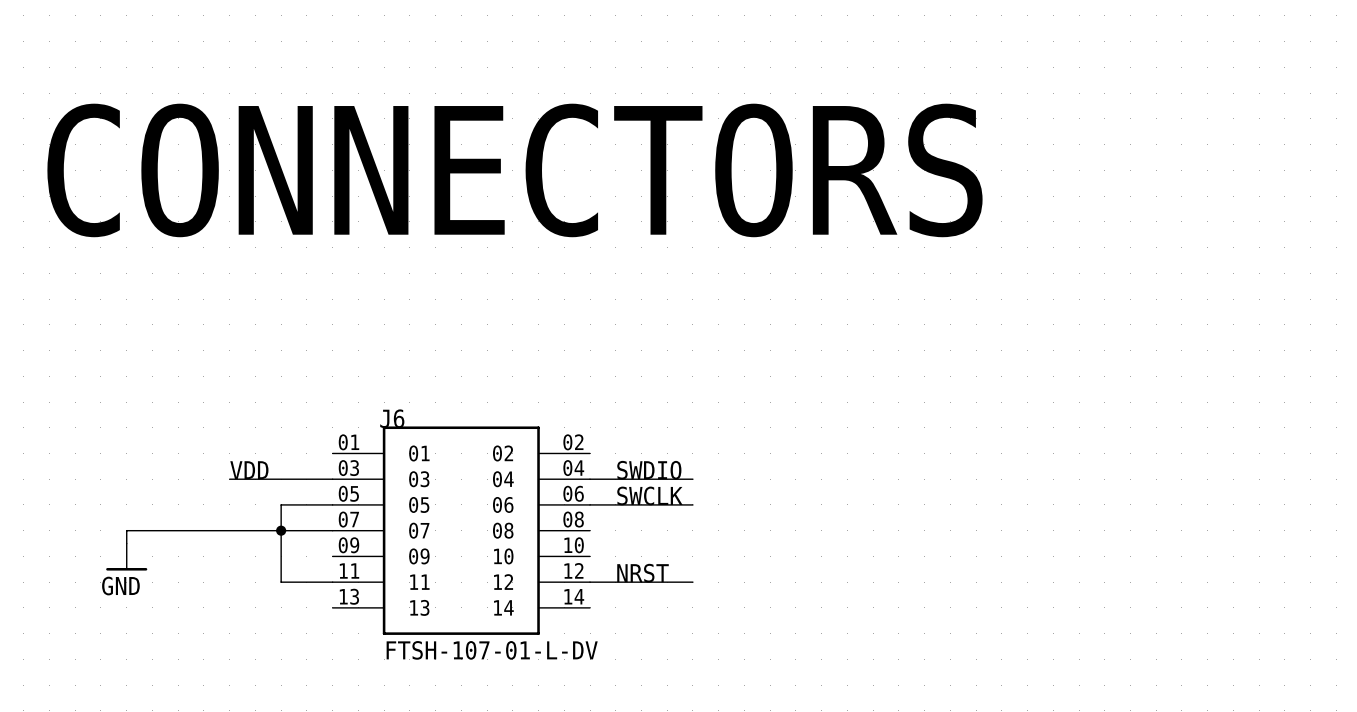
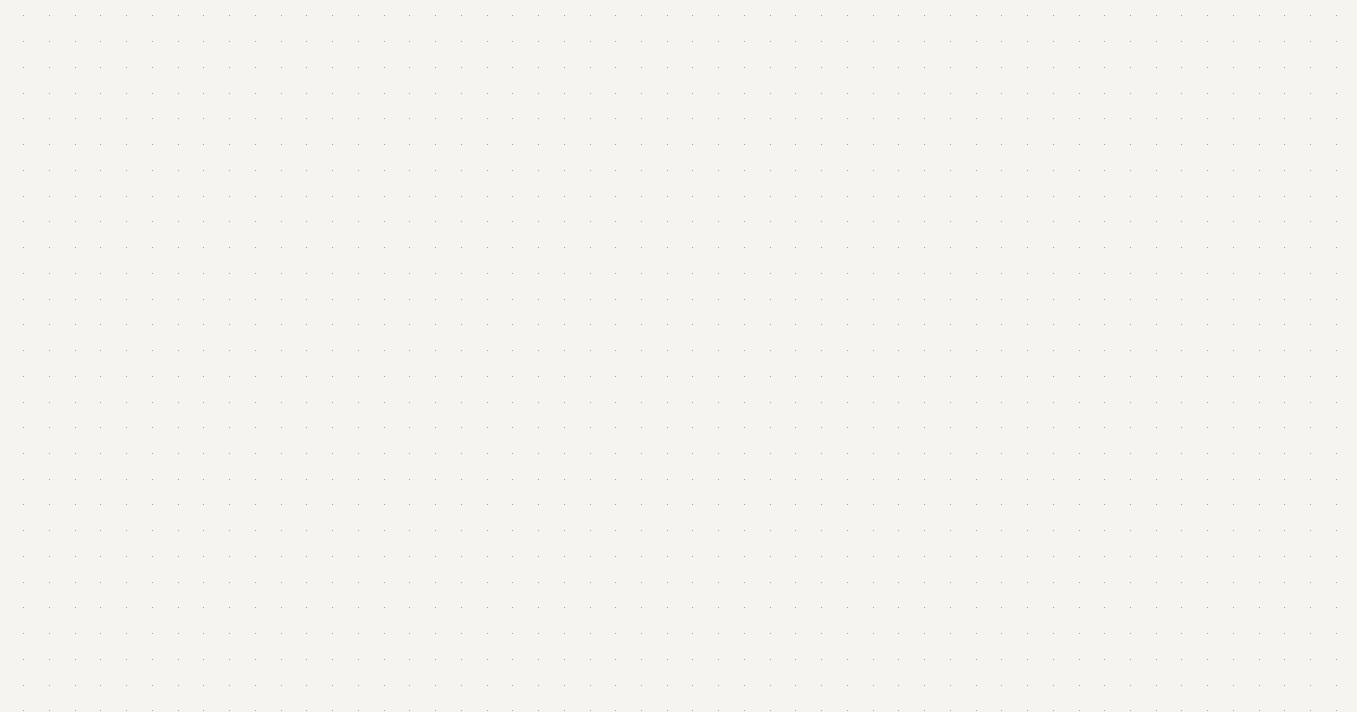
text: CONNECTORS (515, 170) -> none
label: VDD (249, 470) -> none
label: SWDIO (649, 470) -> none
wire: (229, 479) (332, 479) -> none
wire: (590, 479) (692, 479) -> none
label: SWCLK (649, 495) -> none
wire: (332, 504) (281, 504) (281, 582) (332, 582) -> none
wire: (590, 504) (692, 504) -> none
junction: (281, 530) -> none
wire: (332, 530) (126, 530) (126, 543) -> none
J6: FTSH-107-01-L-DV (461, 530) -> none
power symbol: GND (126, 557) -> none
label: NRST (643, 573) -> none
wire: (590, 582) (692, 582) -> none

